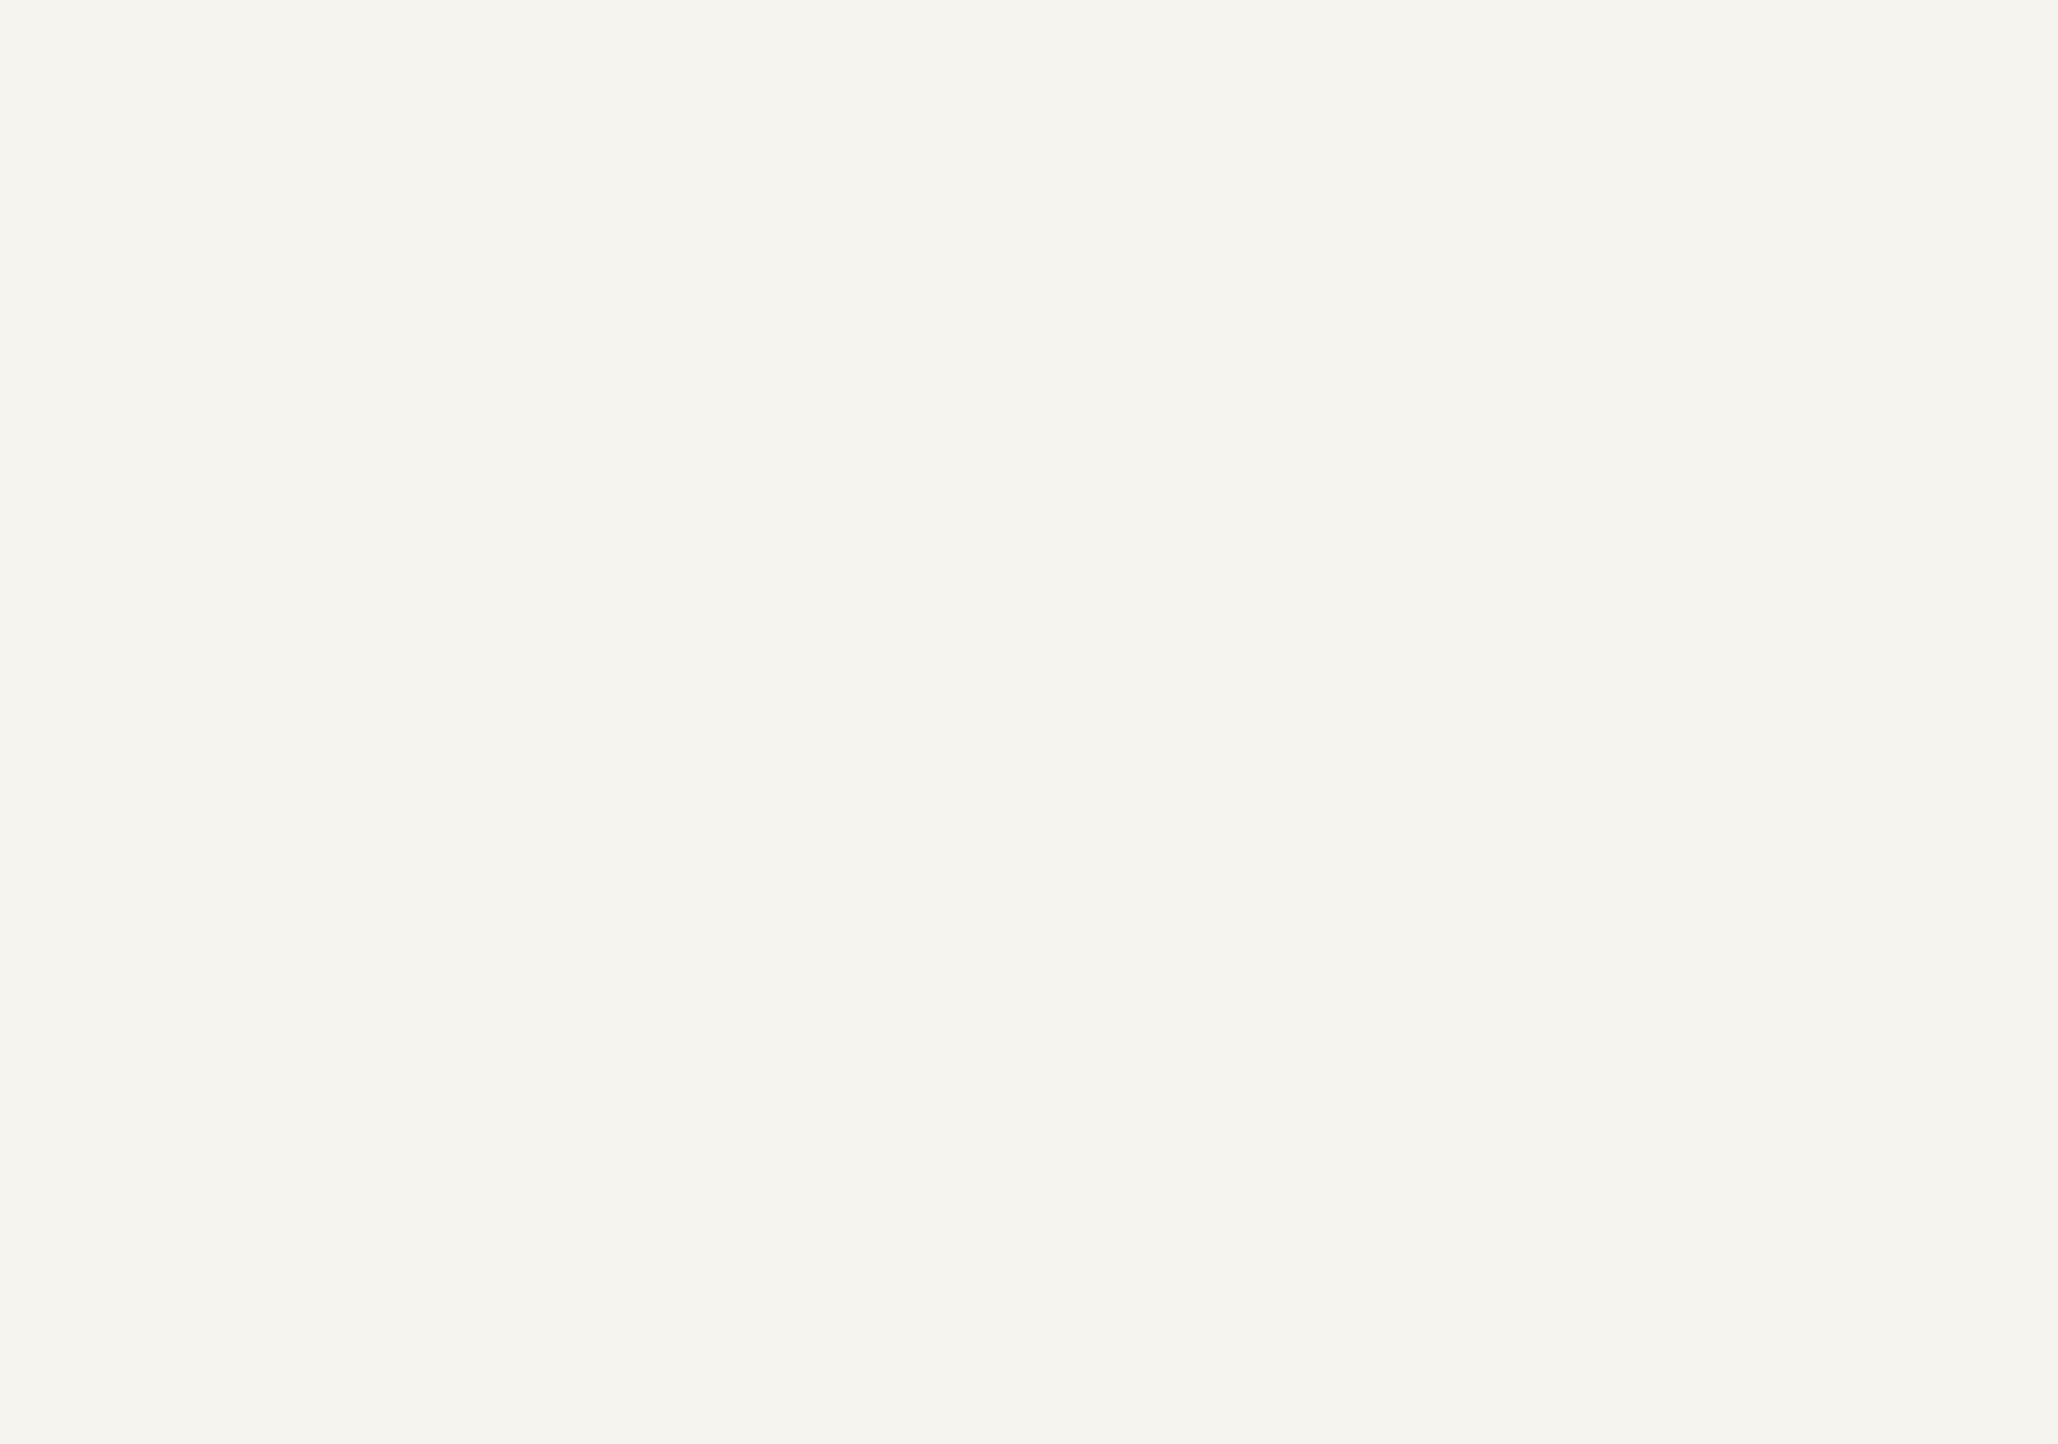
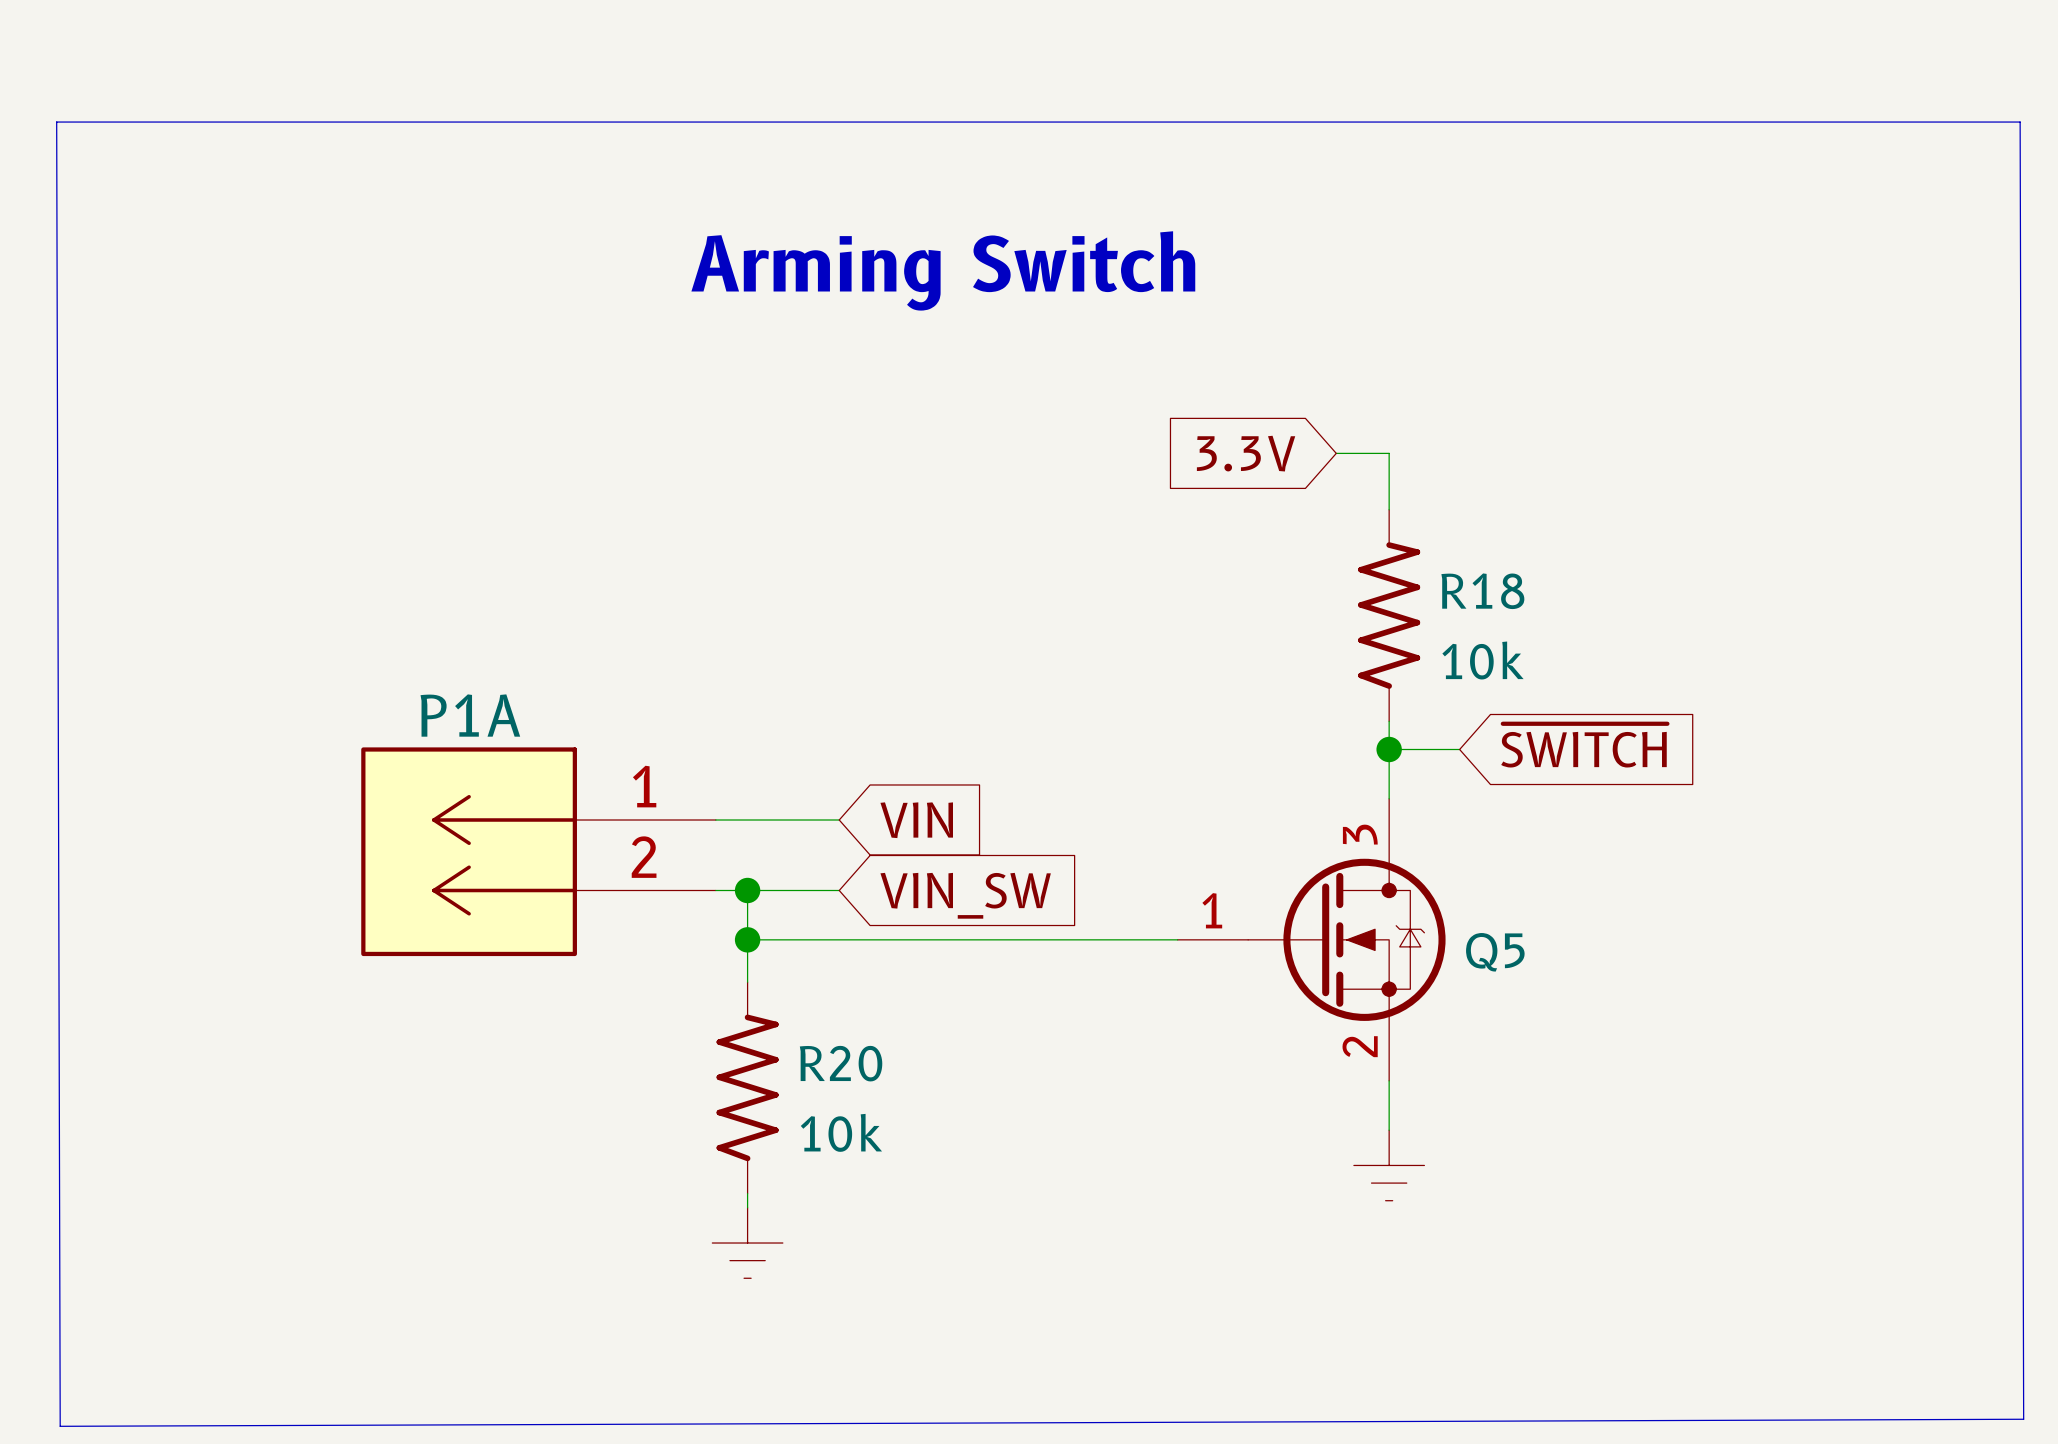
line: none -> (56, 122) (60, 1426) (2023, 1419) (2020, 122) (56, 122)
text: none -> Arming Switch (943, 270)
global label: none -> 3.3V (1246, 453)
wire: none -> (1336, 453) (1389, 453) (1389, 509)
R18: none -> 10k (1389, 615)
wire: none -> (1389, 721) (1389, 798)
global label: none -> ~{SWITCH} (1584, 745)
wire: none -> (1389, 749) (1459, 749)
junction: none -> (1389, 749)
wire: none -> (715, 820) (839, 820)
global label: none -> VIN (916, 820)
P1A: none -> (538, 851)
wire: none -> (715, 890) (839, 890)
wire: none -> (747, 890) (747, 982)
junction: none -> (747, 890)
global label: none -> VIN_SW (965, 895)
wire: none -> (747, 939) (1177, 939)
junction: none -> (747, 939)
Q5: none -> (1311, 939)
wire: none -> (1389, 1080) (1389, 1130)
R20: none -> 10k (747, 1087)
power symbol: none -> (1389, 1165)
wire: none -> (747, 1193) (747, 1207)
power symbol: none -> (747, 1243)

